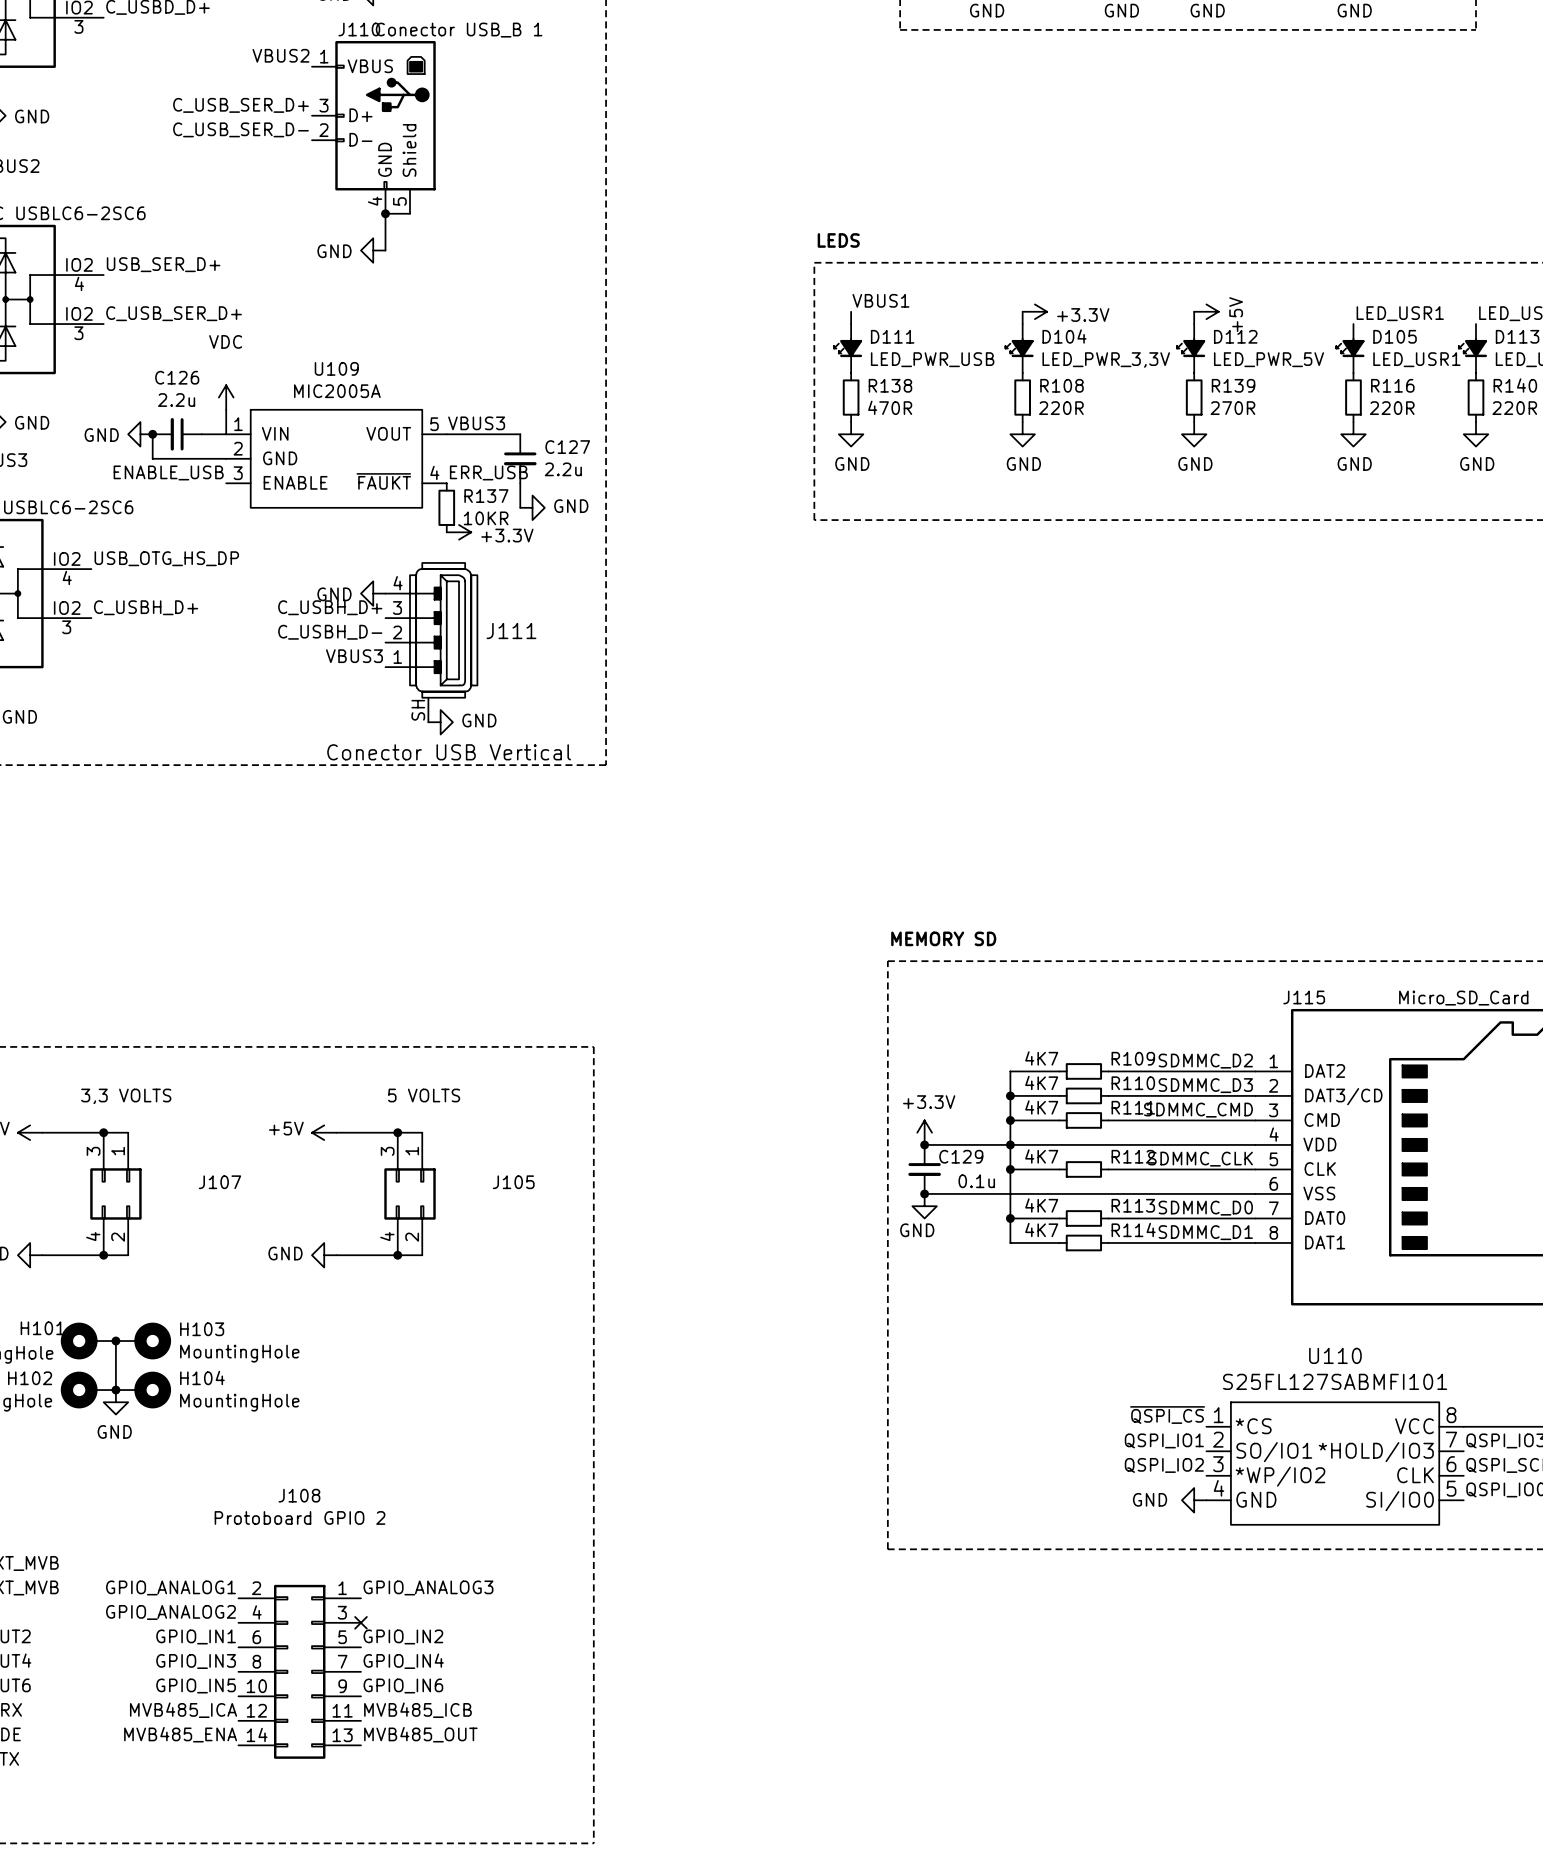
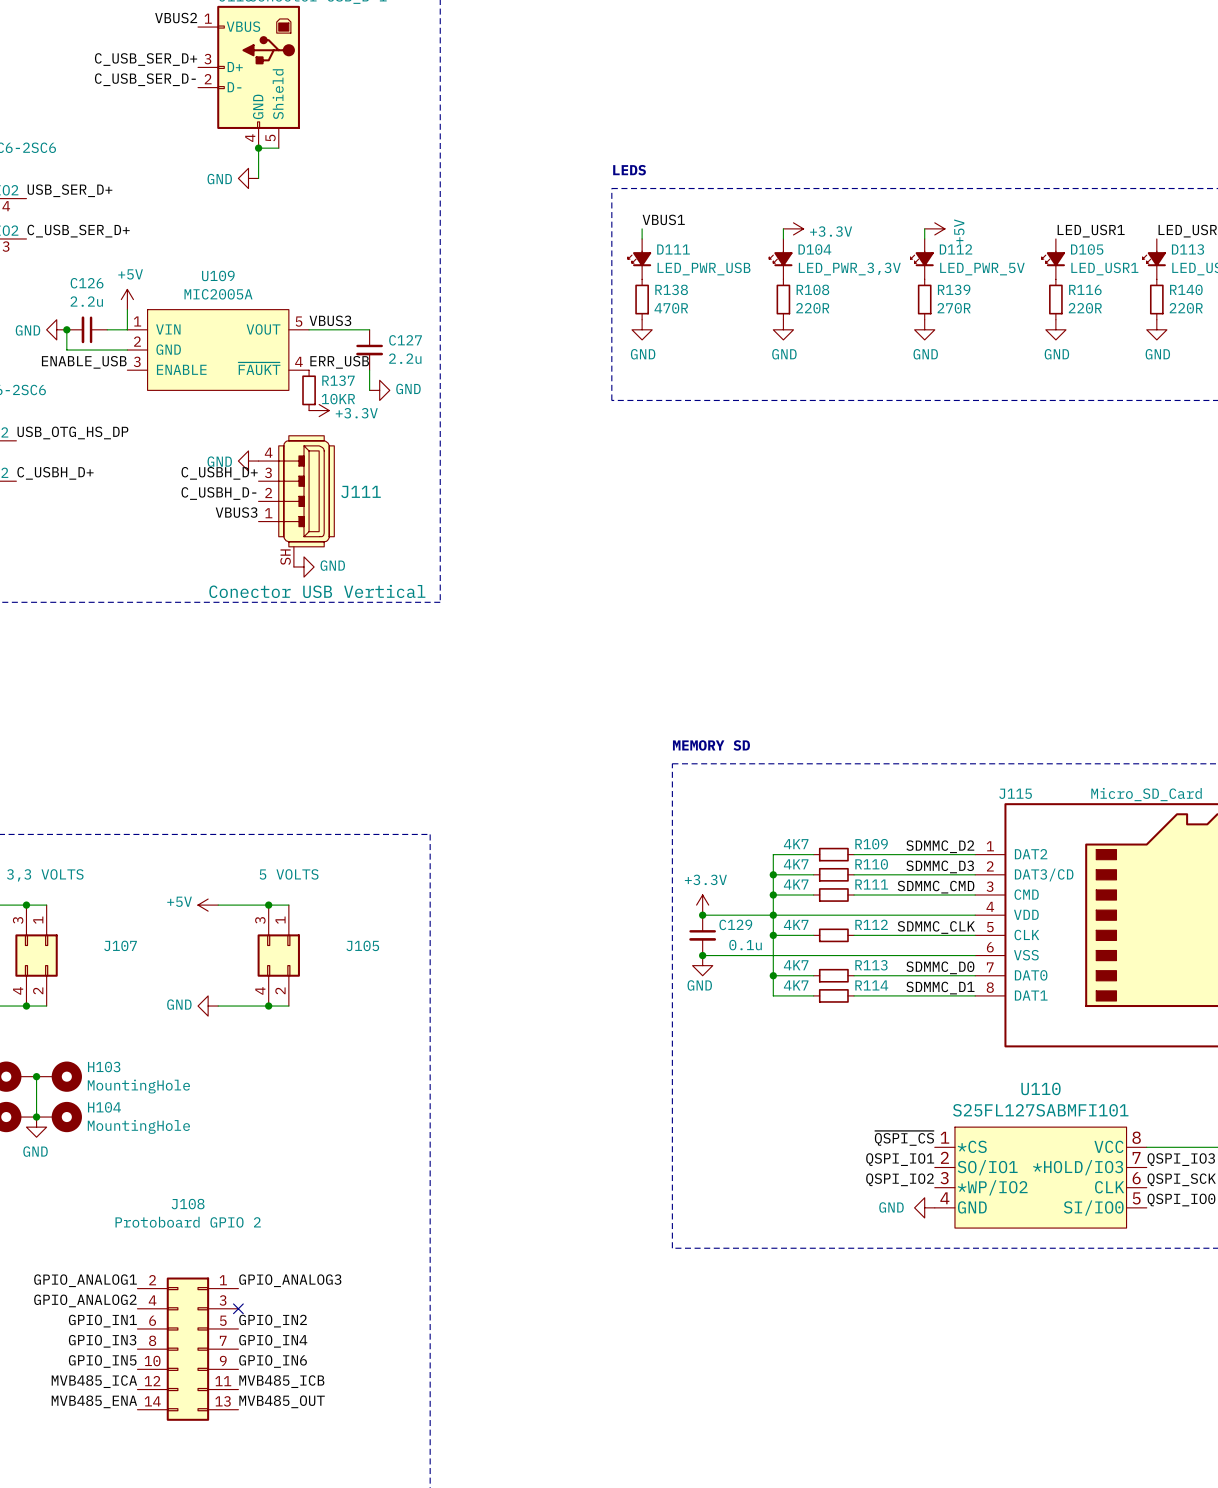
power symbol: VDC (226, 397) -> +5V (127, 299)

